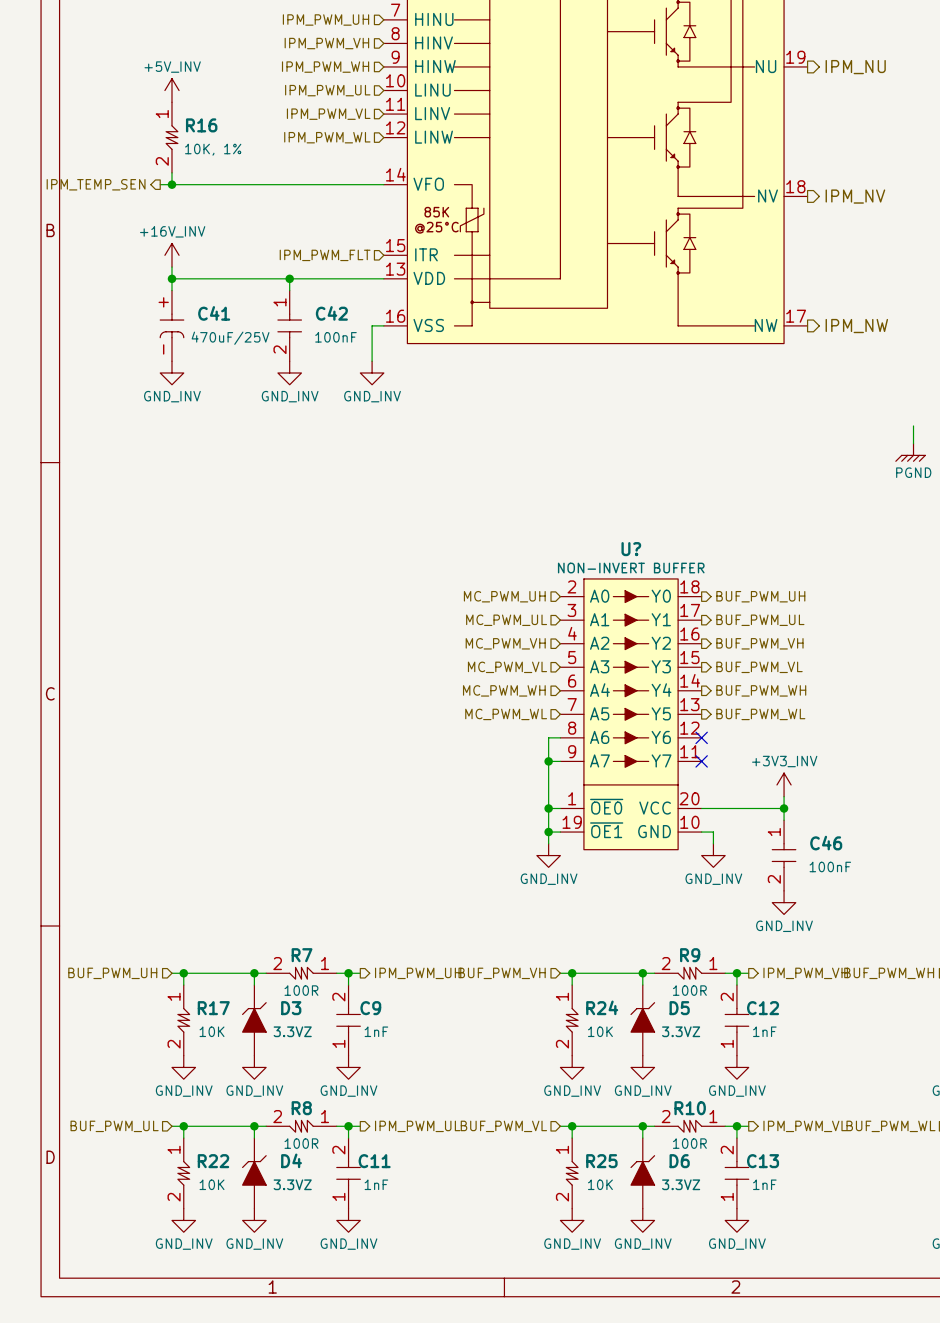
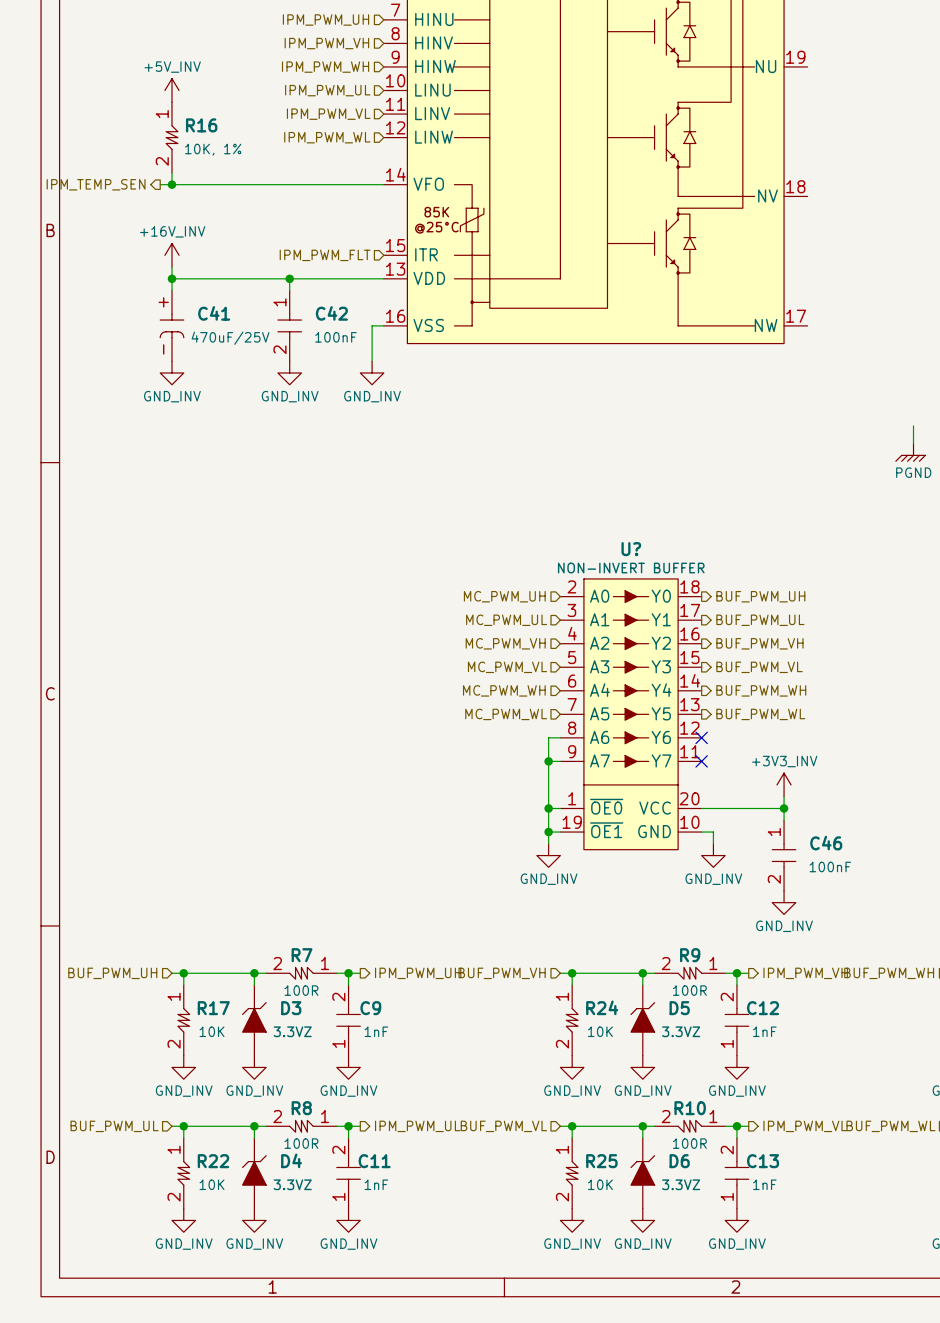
hierarchical label: IPM_NU (855, 67) -> none
hierarchical label: IPM_NV (855, 196) -> none
hierarchical label: IPM_NW (856, 326) -> none

